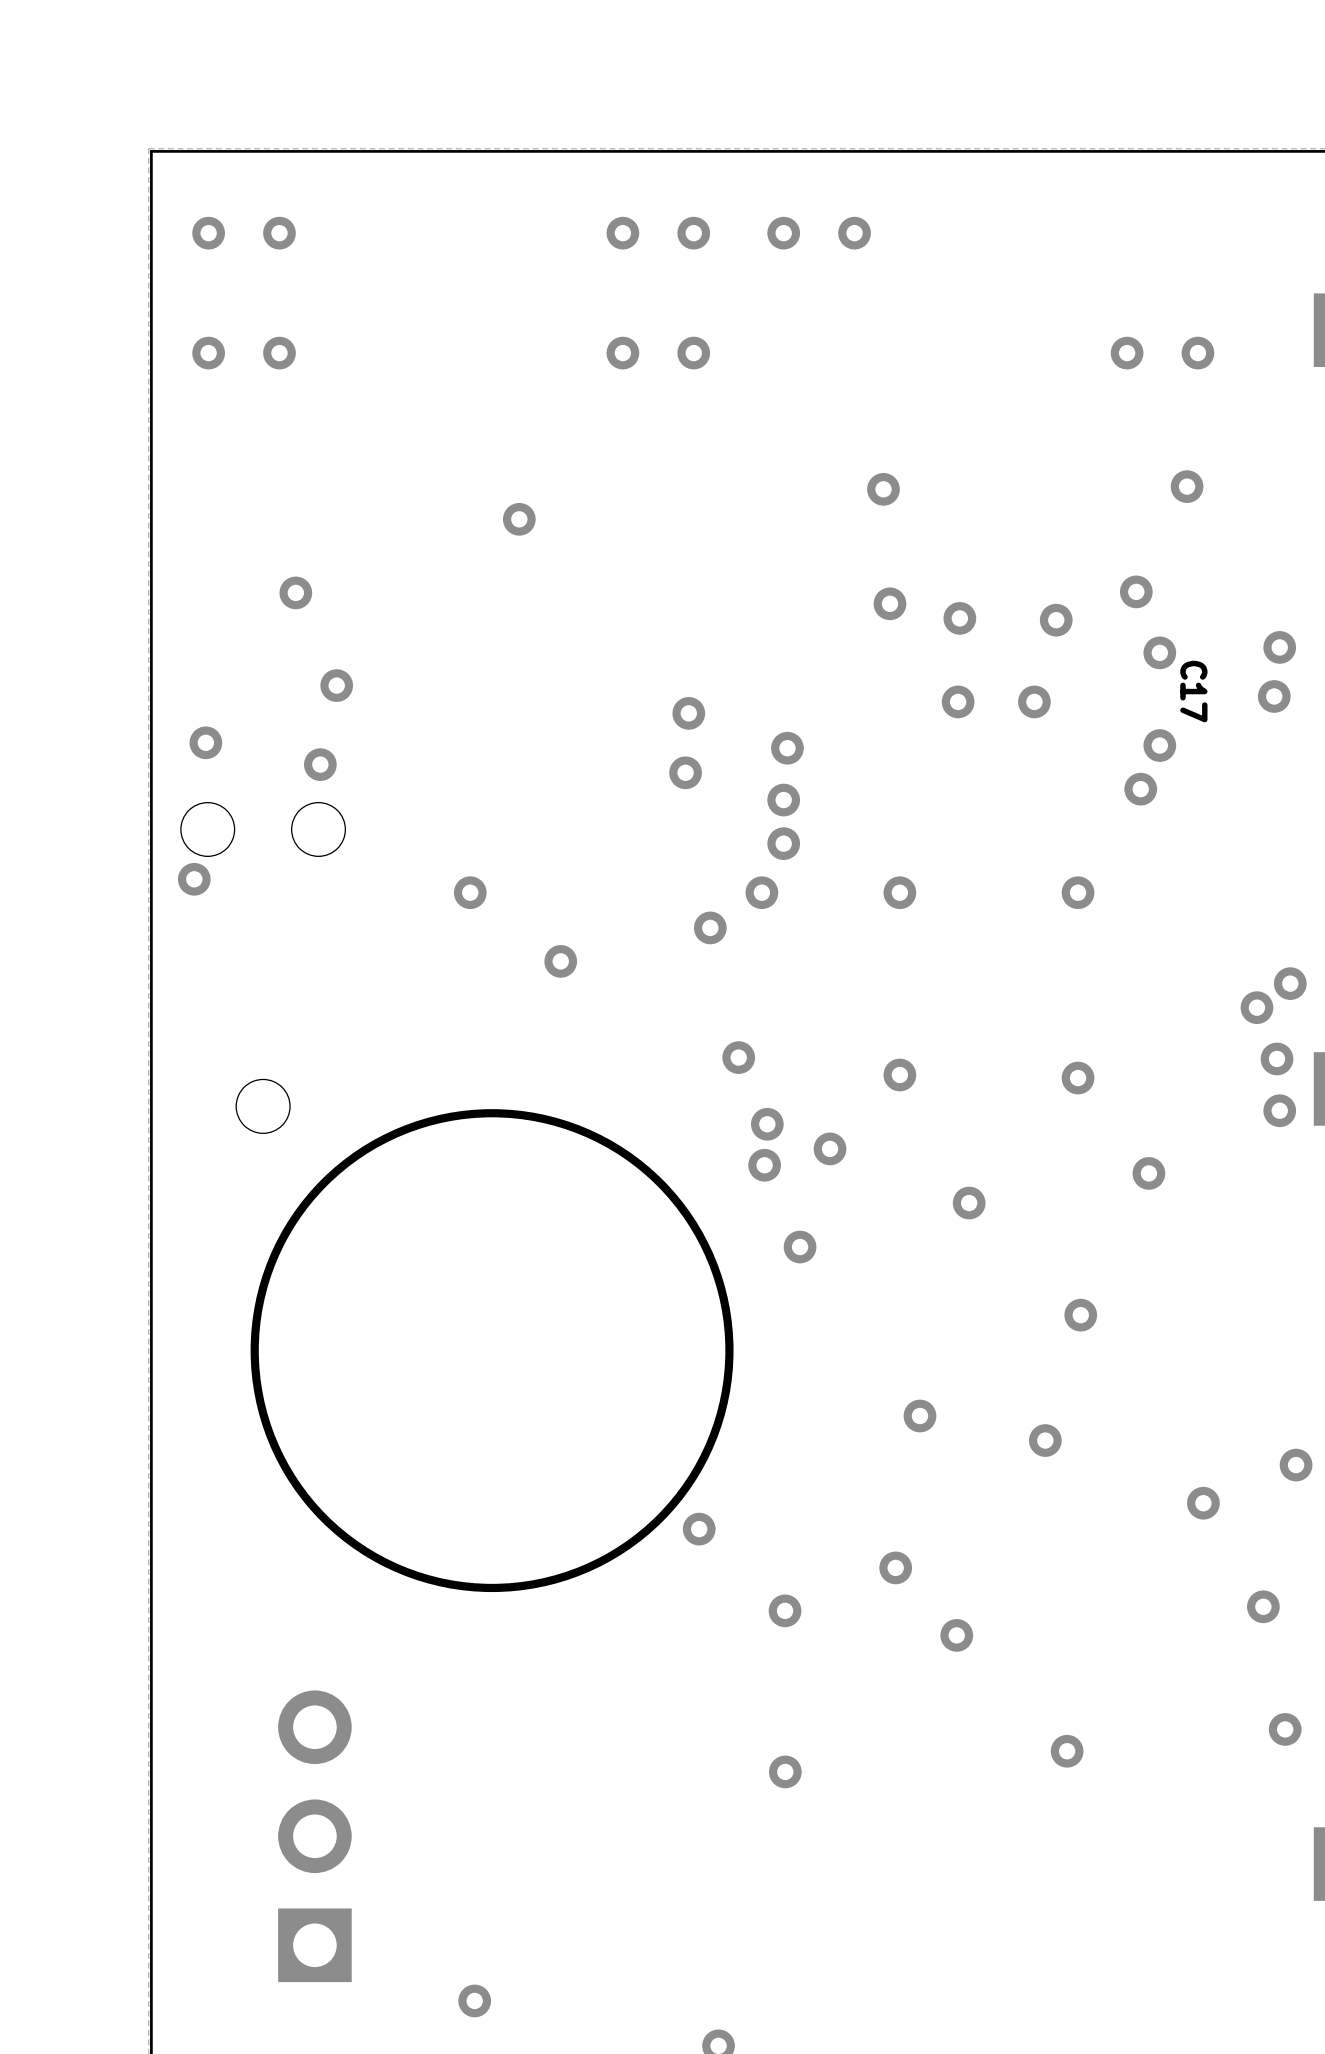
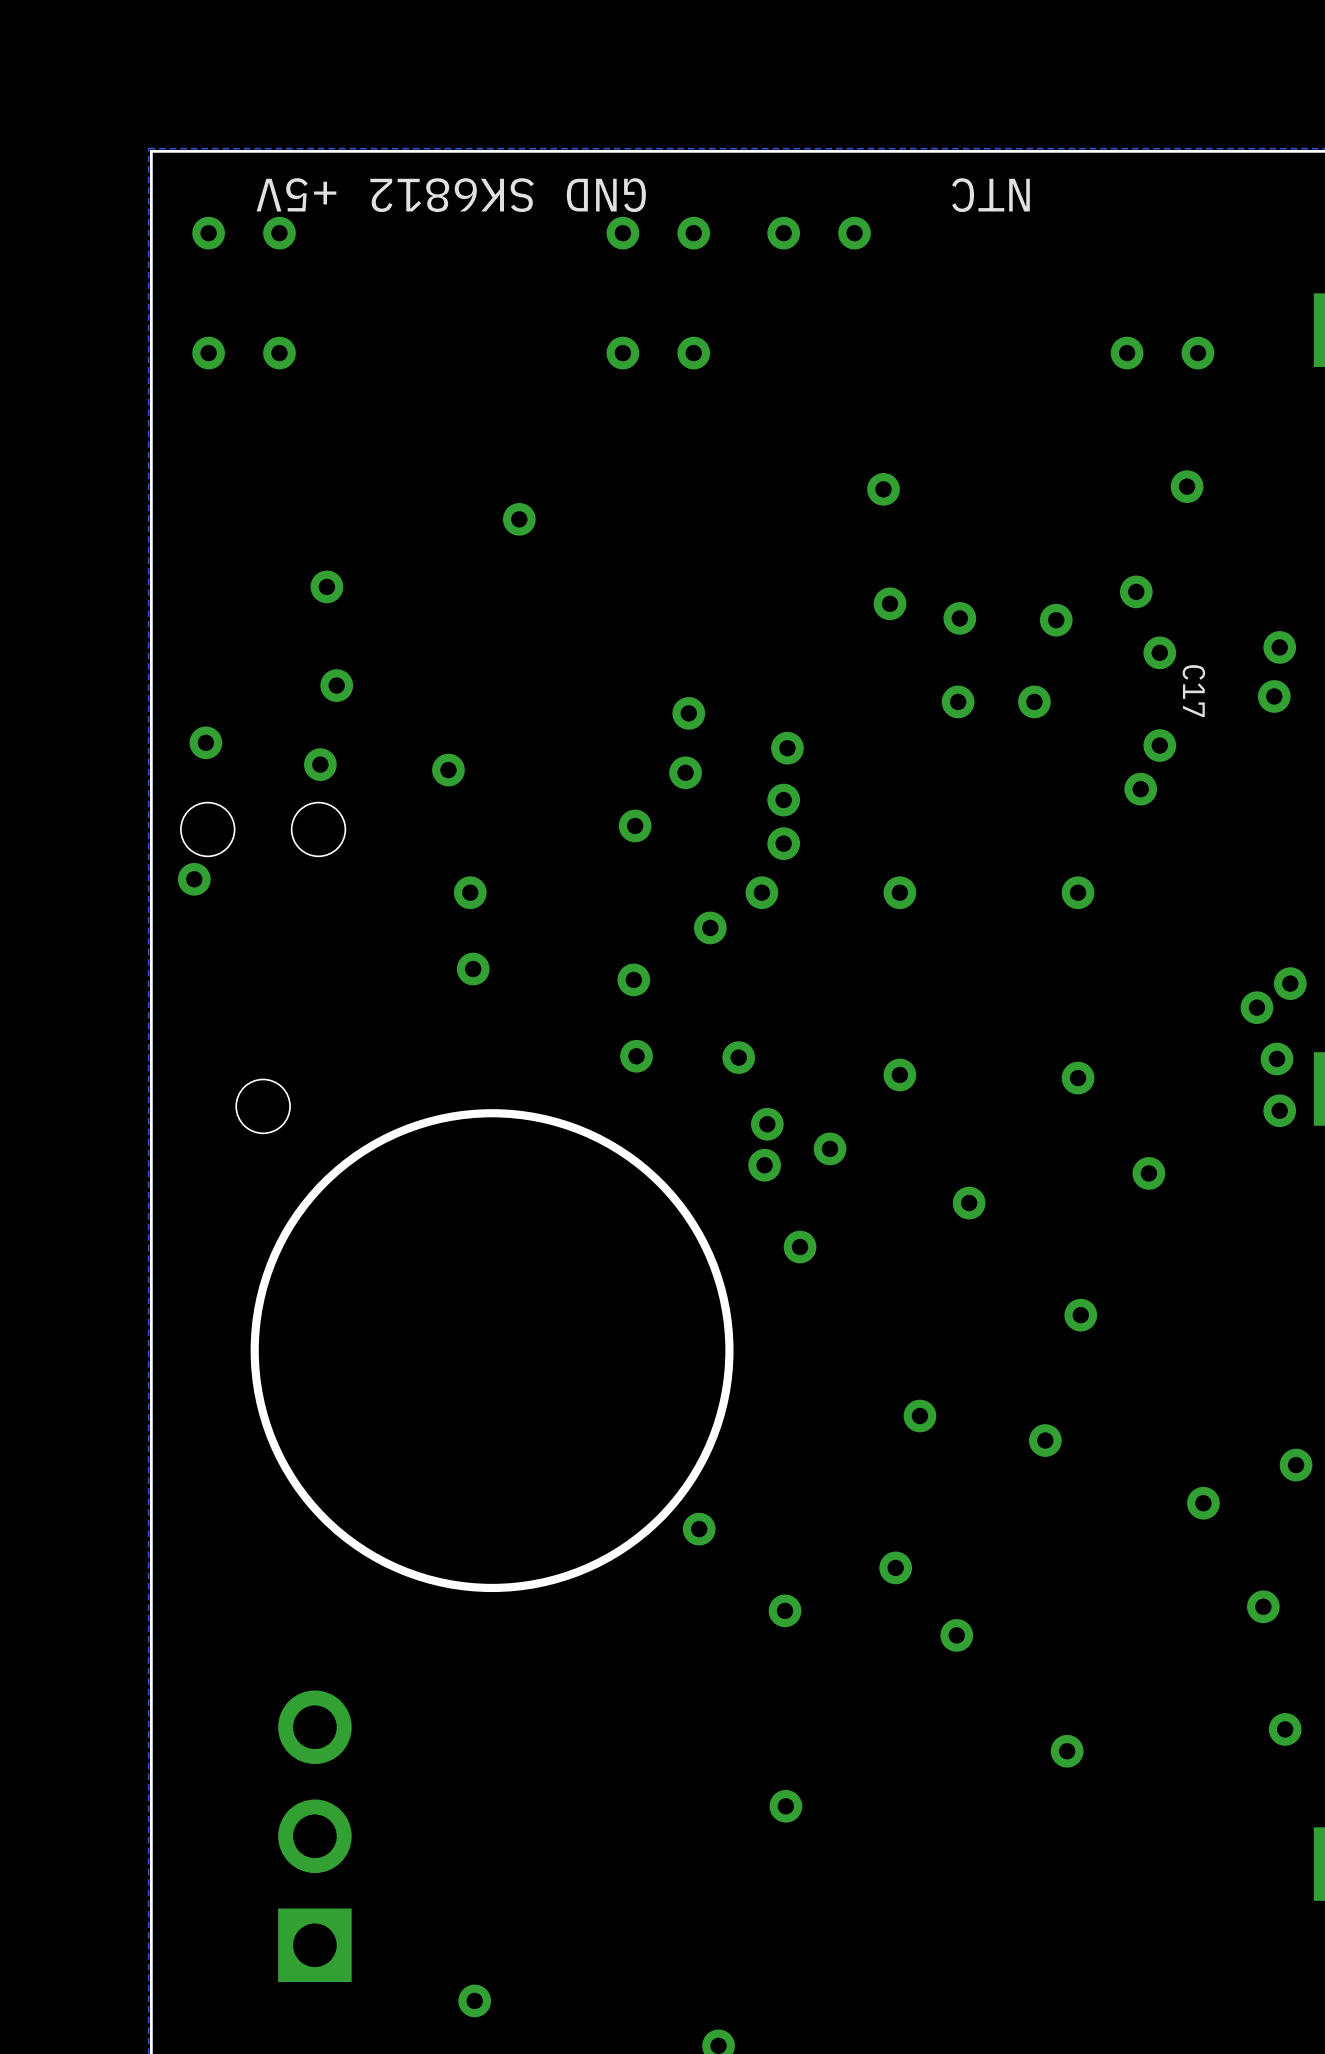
text: none -> GND SK6812 +5V (451, 195)
text: none -> NTC (990, 195)
via position: (295, 592) -> (326, 586)
via: none -> (448, 770)
via: none -> (635, 825)
via: (560, 961) -> none
via: none -> (473, 969)
via: none -> (633, 979)
via: none -> (636, 1056)
via position: (785, 1771) -> (785, 1806)

